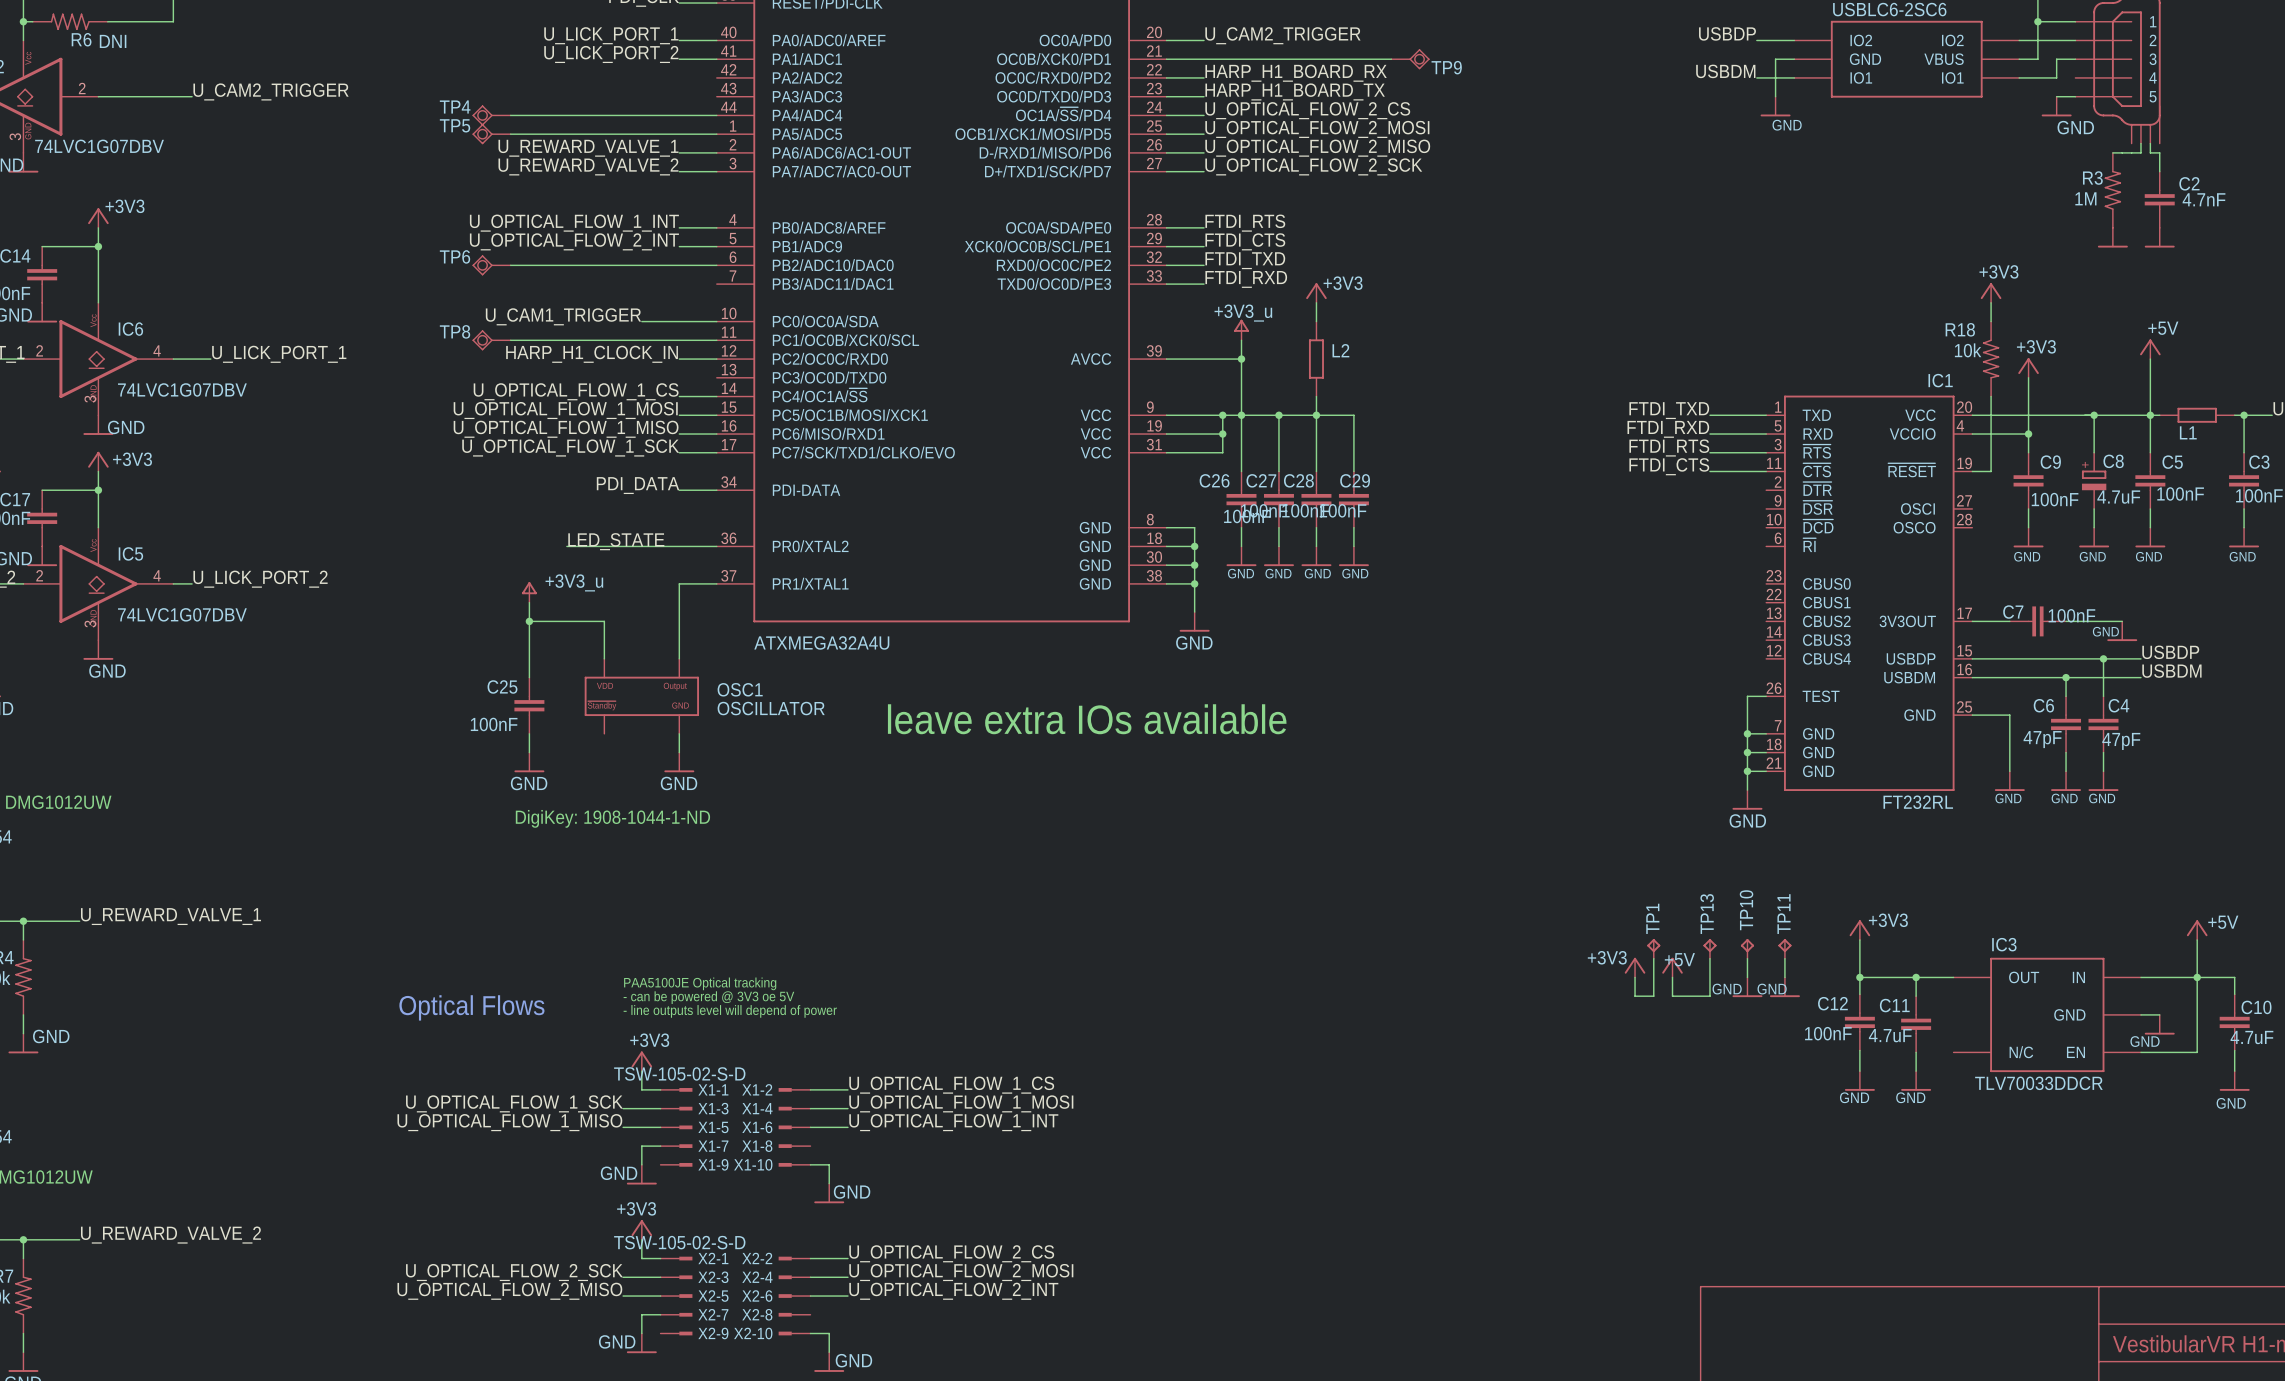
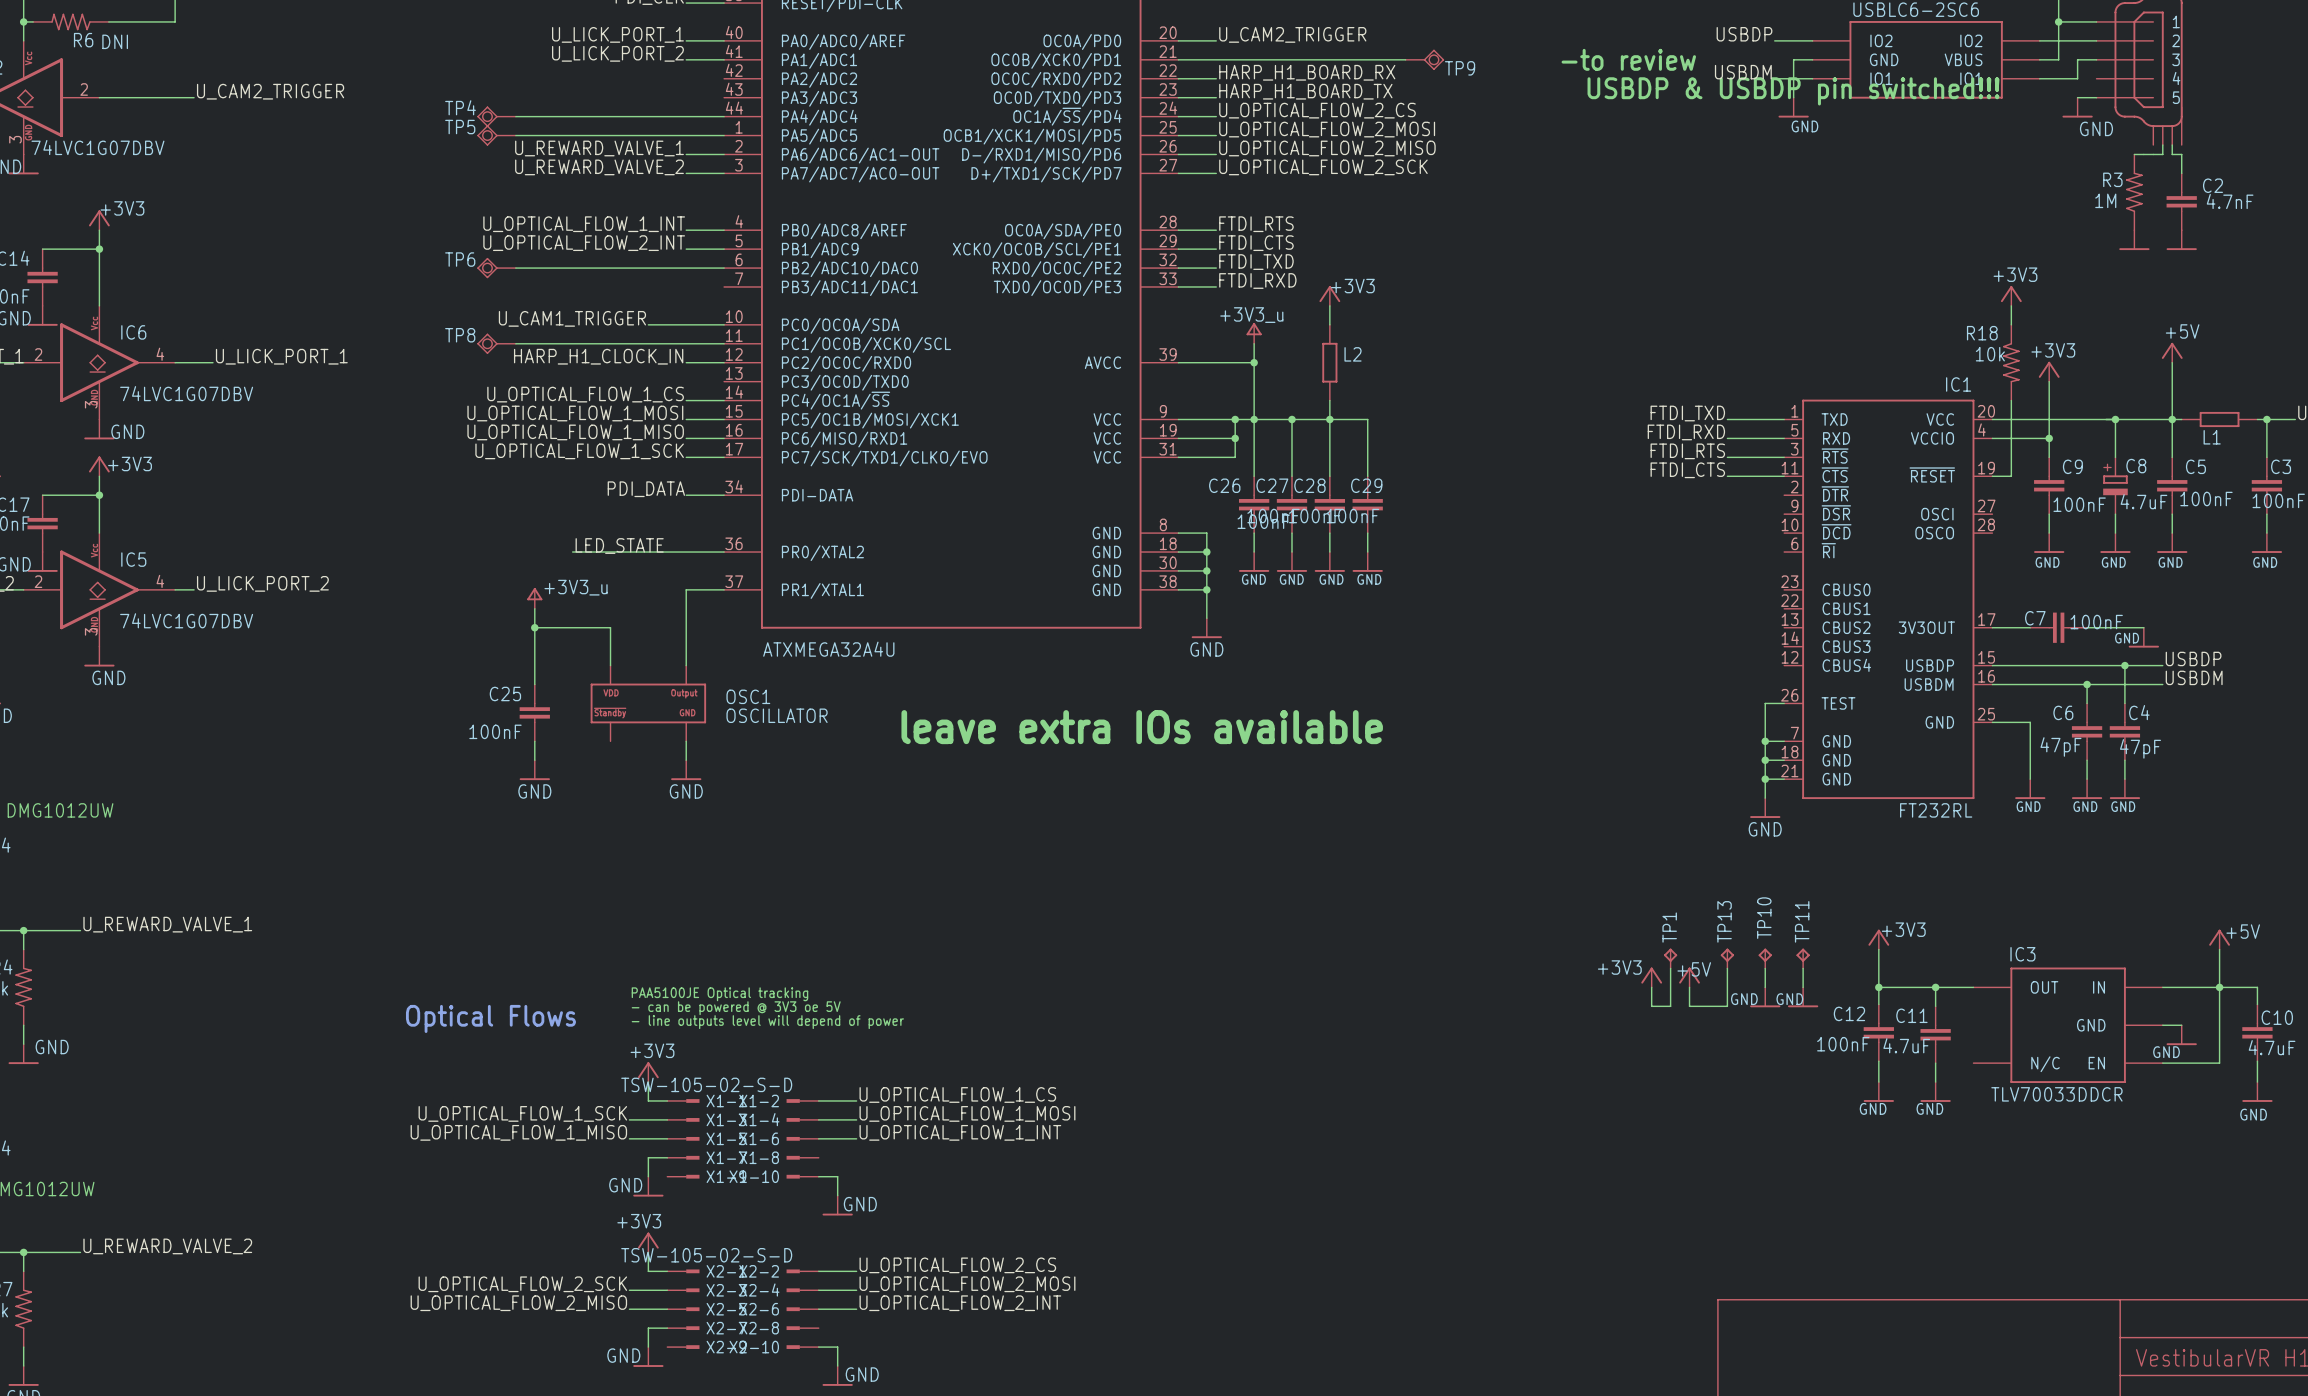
text: none -> -to review (1628, 59)
text: none -> USBDP & USBDP pin switched!!! (1793, 91)
text: DigiKey: 1908-1044-1-ND (612, 818) -> none

